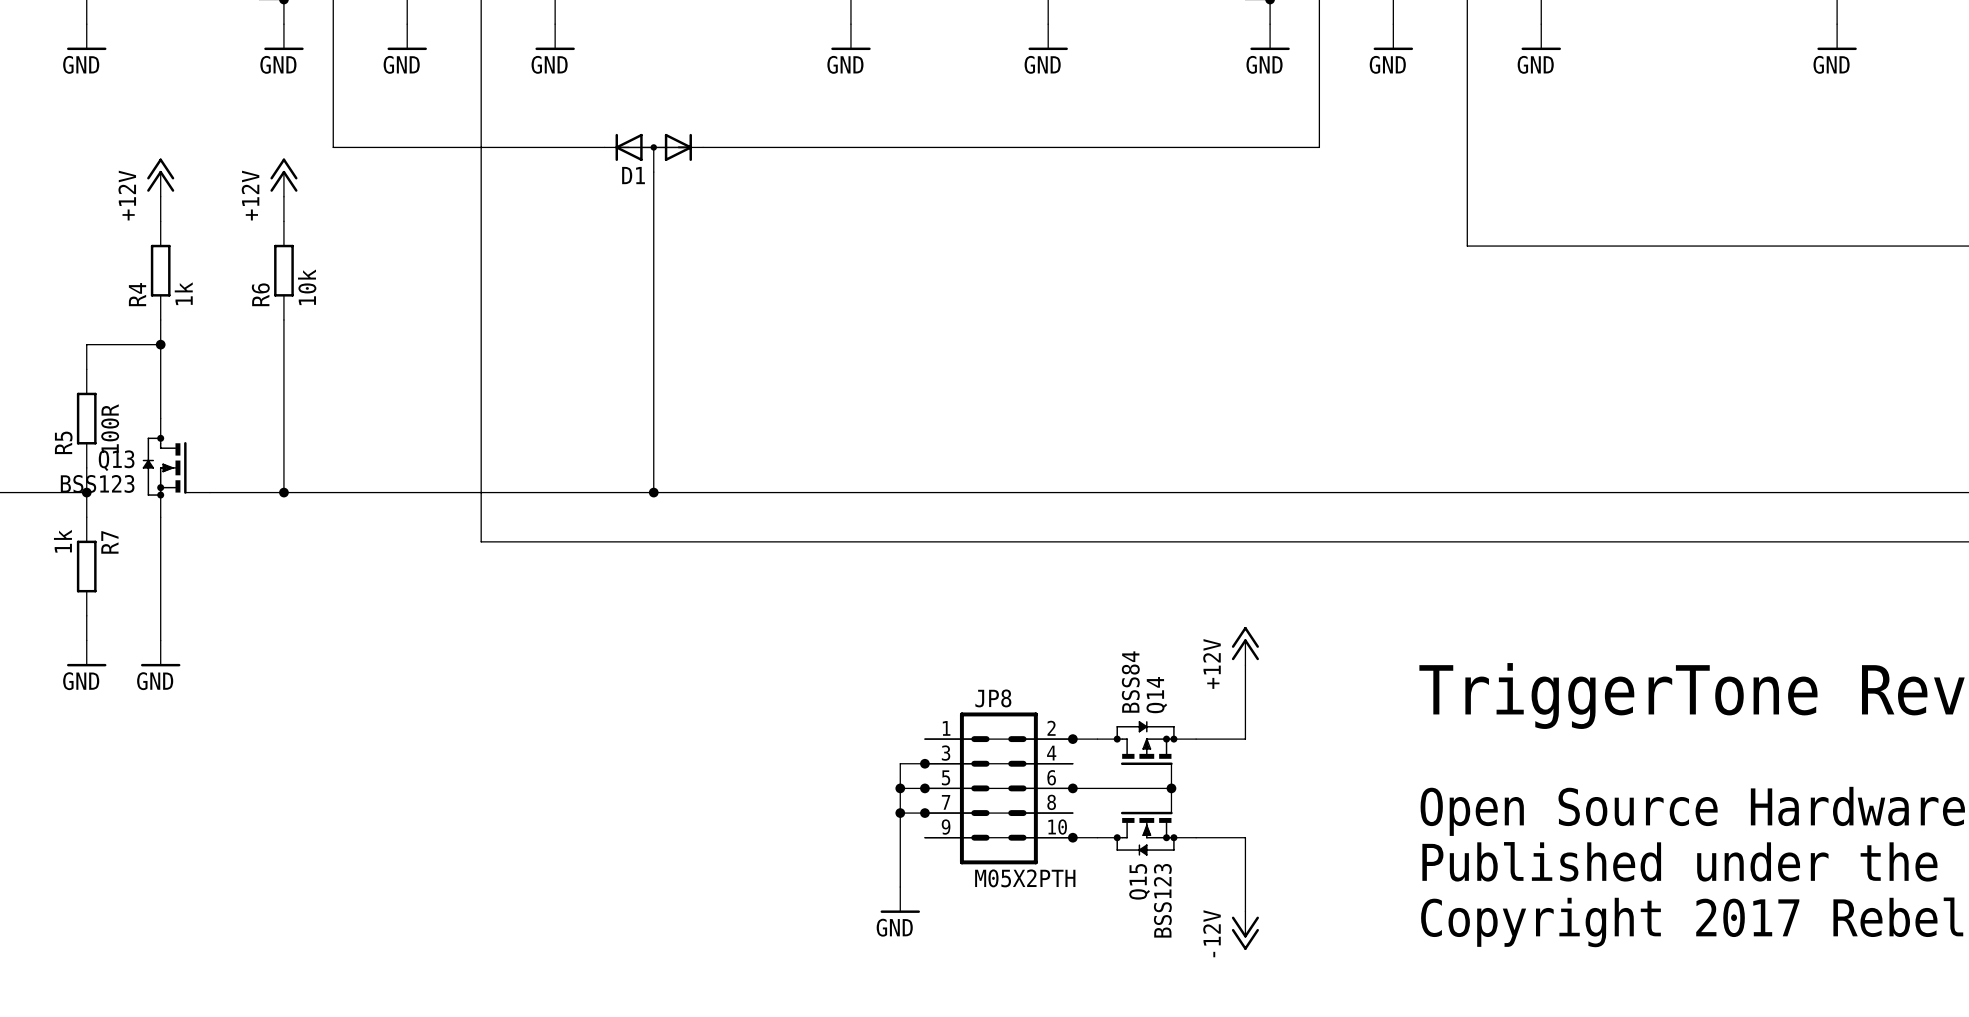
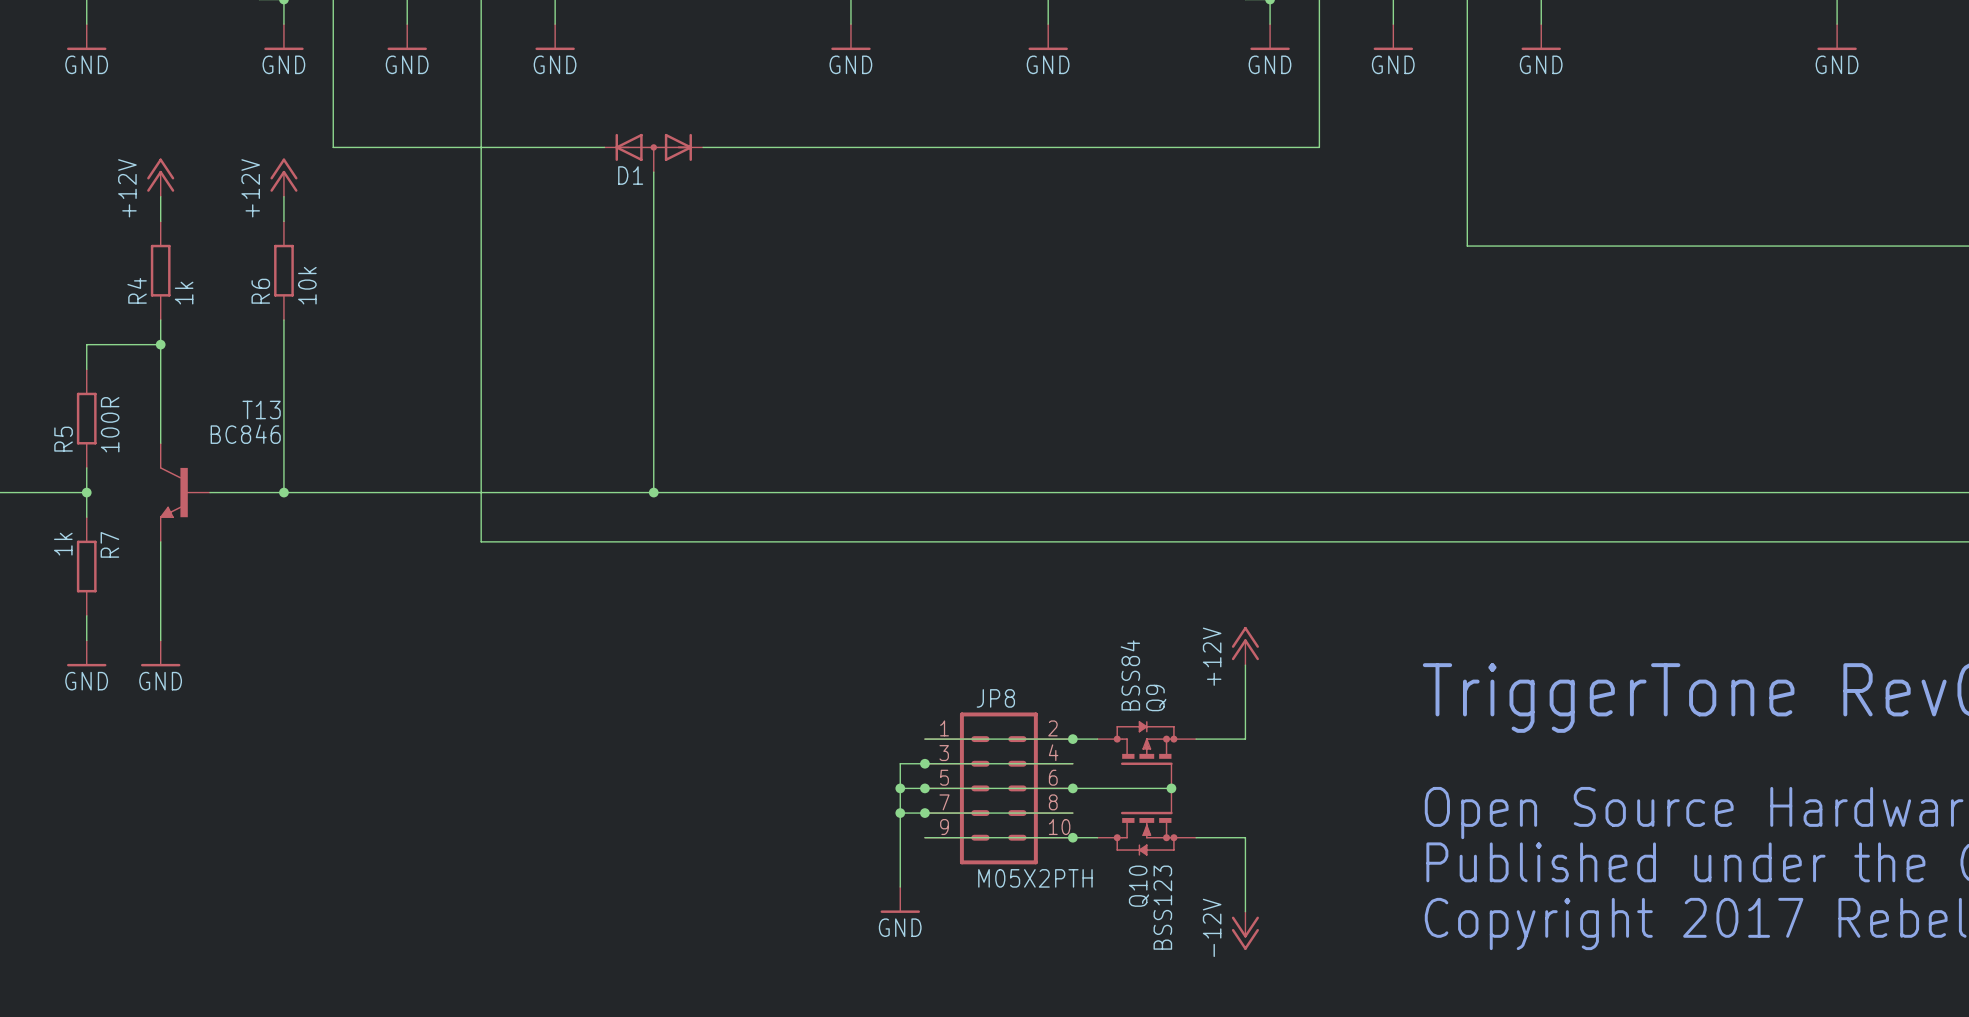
Q13: BSS123 (176, 467) -> none
T13: none -> BC846 (184, 492)
Q14 name: Q14 (1156, 695) -> Q9 (1156, 698)
Q15 name: Q15 (1139, 881) -> Q10 (1139, 886)

